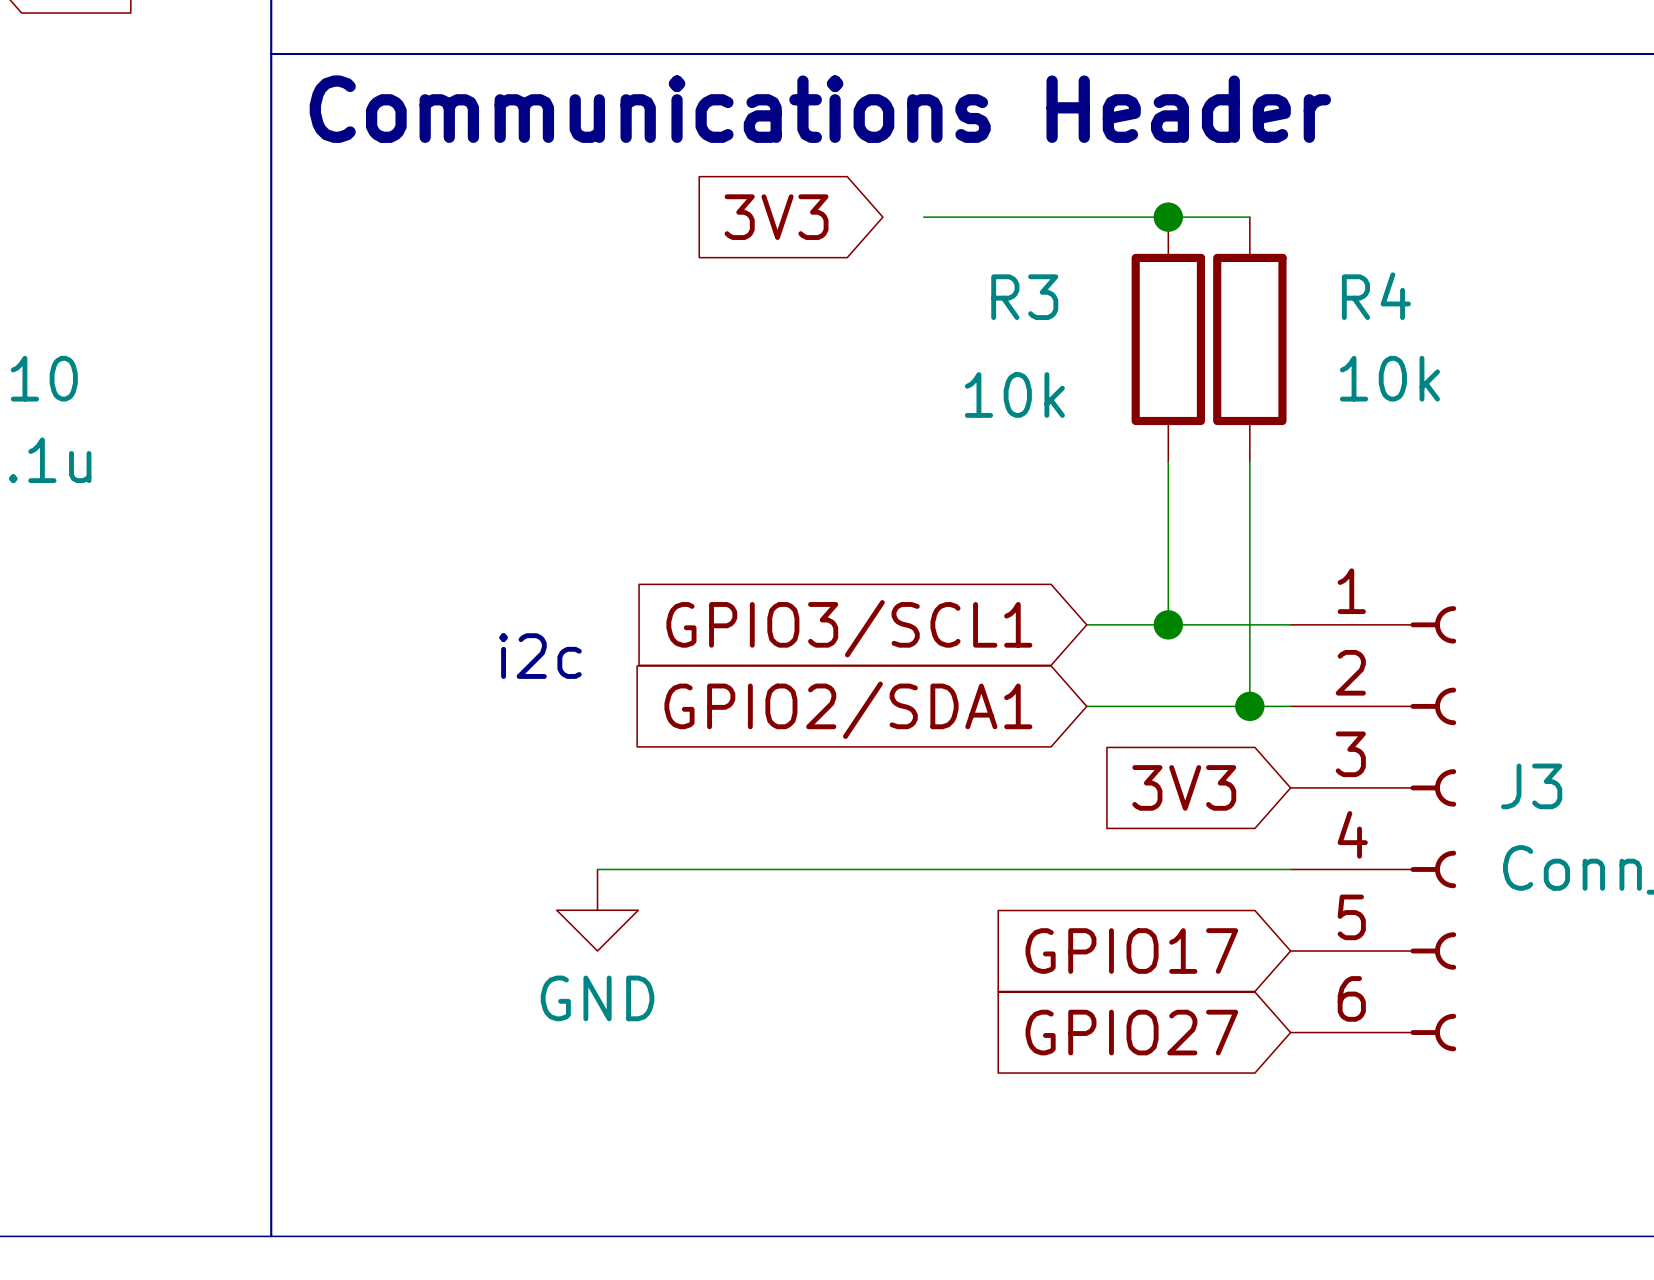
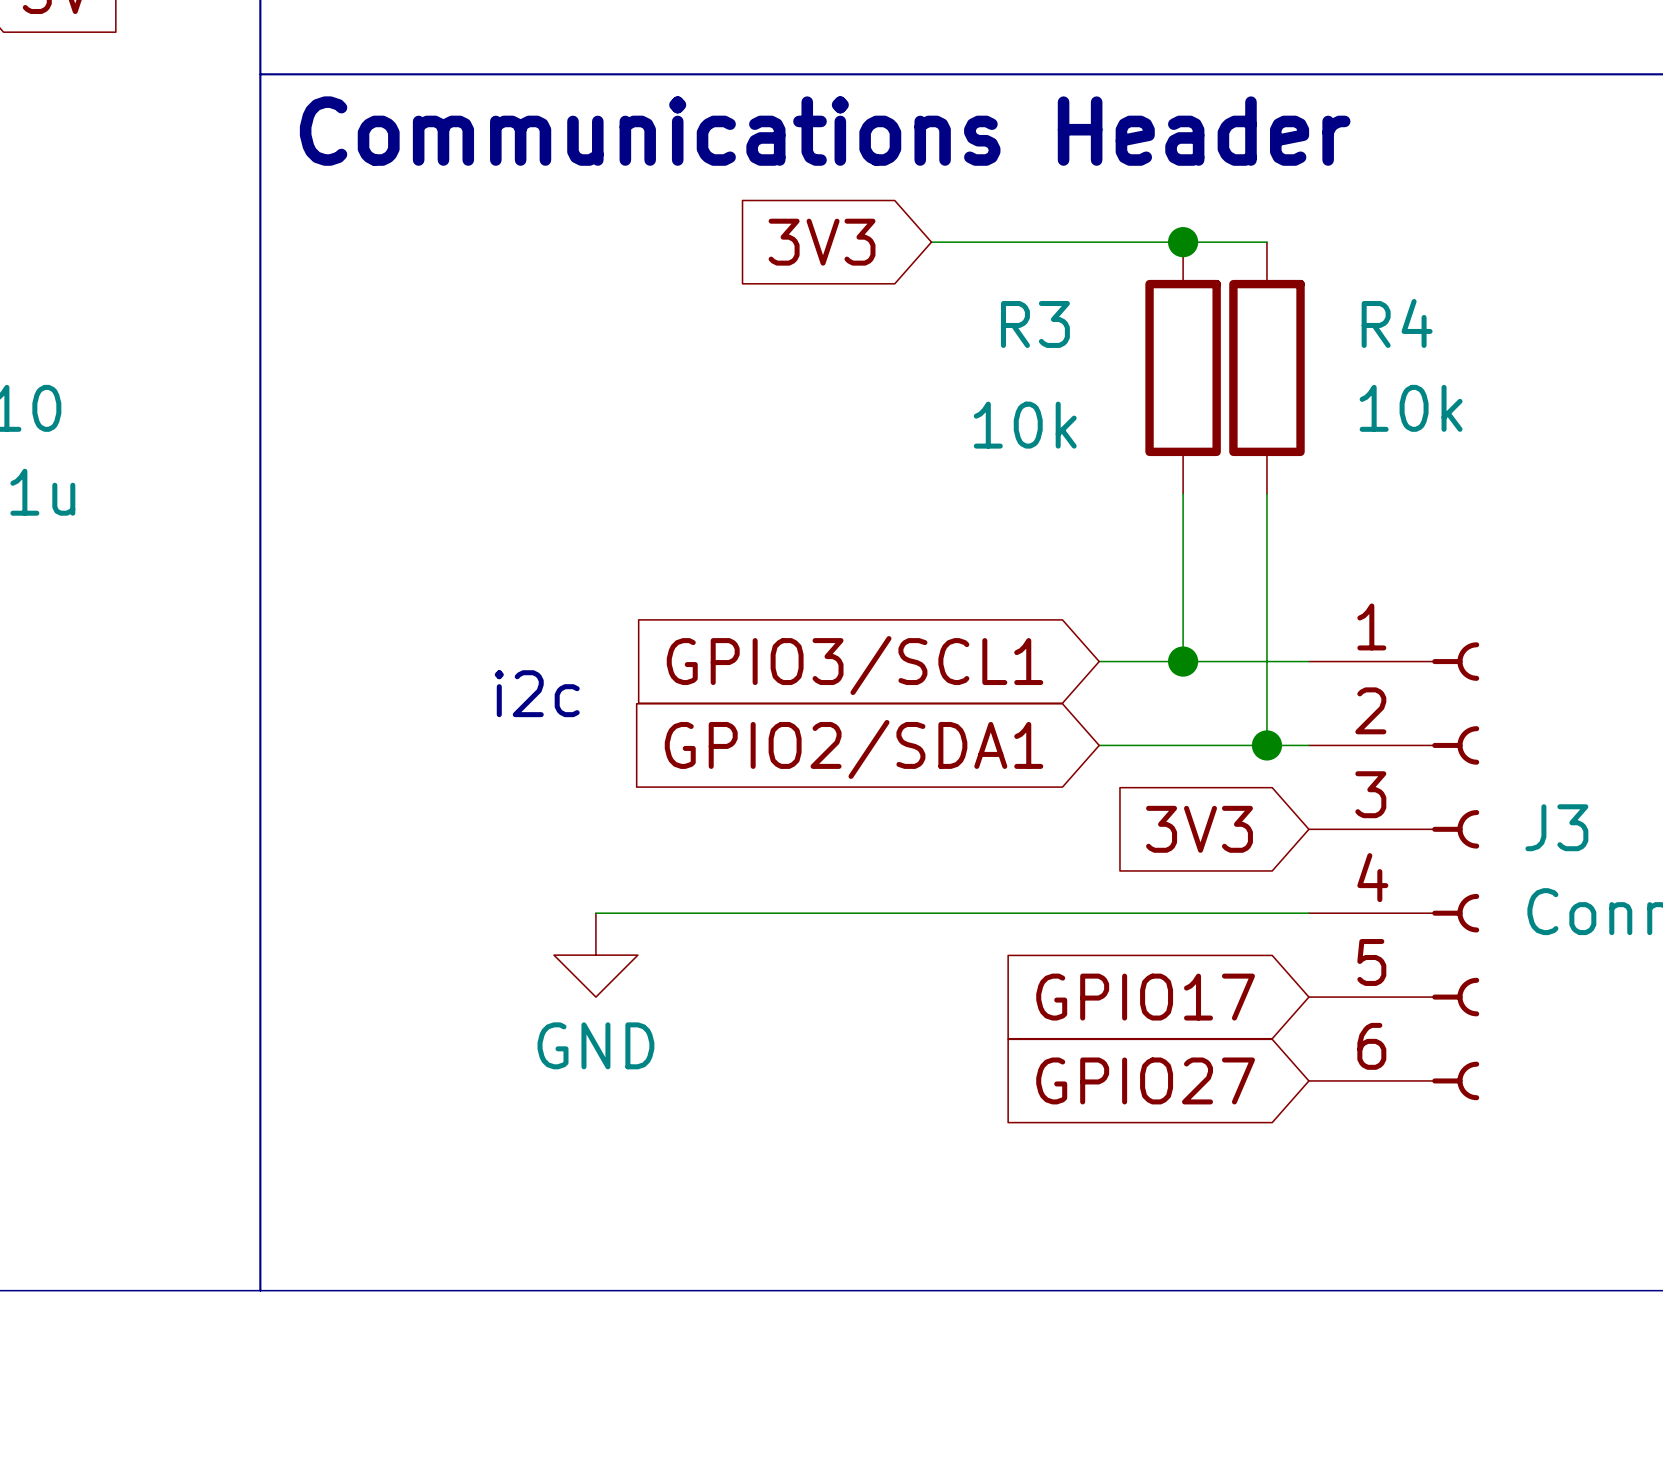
global label position: 3V3 (776, 217) -> 3V3 (822, 242)

